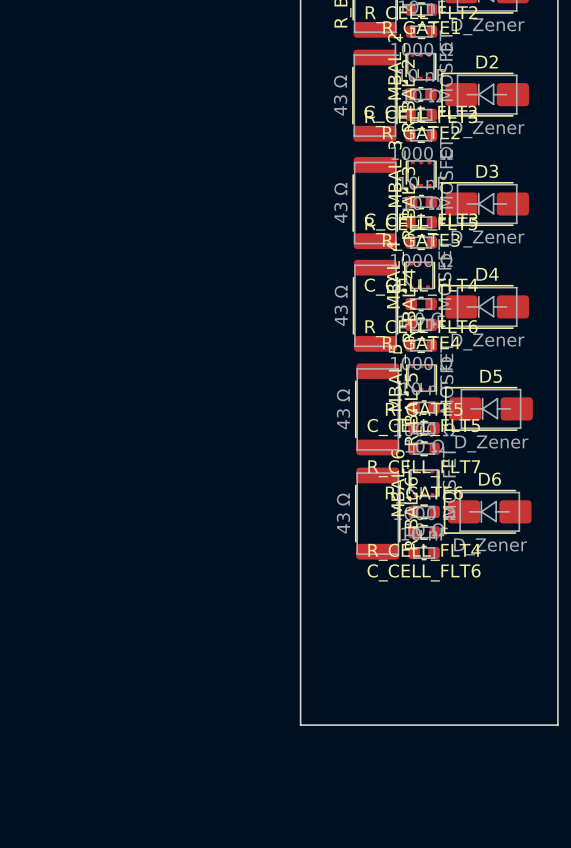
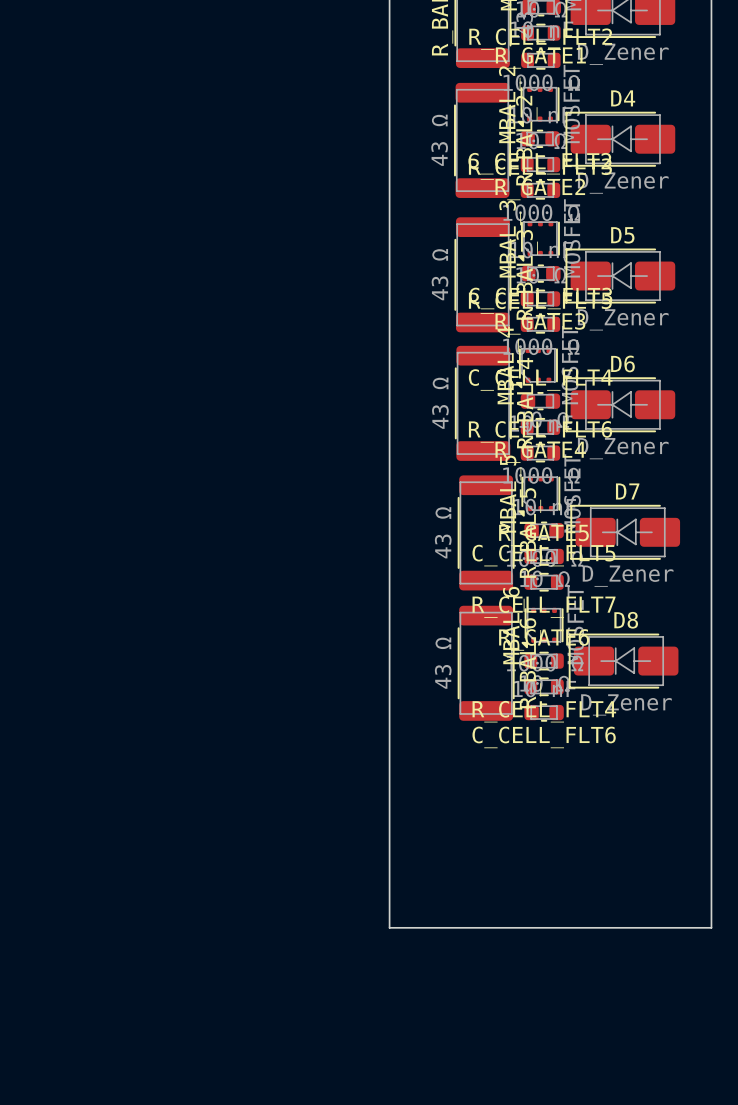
D2 name: D2 (487, 61) -> D4 (623, 98)
D3 name: D3 (487, 171) -> D5 (622, 235)
D4 name: D4 (487, 274) -> D6 (622, 363)
D5 name: D5 (491, 376) -> D7 (627, 491)
D6 name: D6 (490, 479) -> D8 (626, 620)

